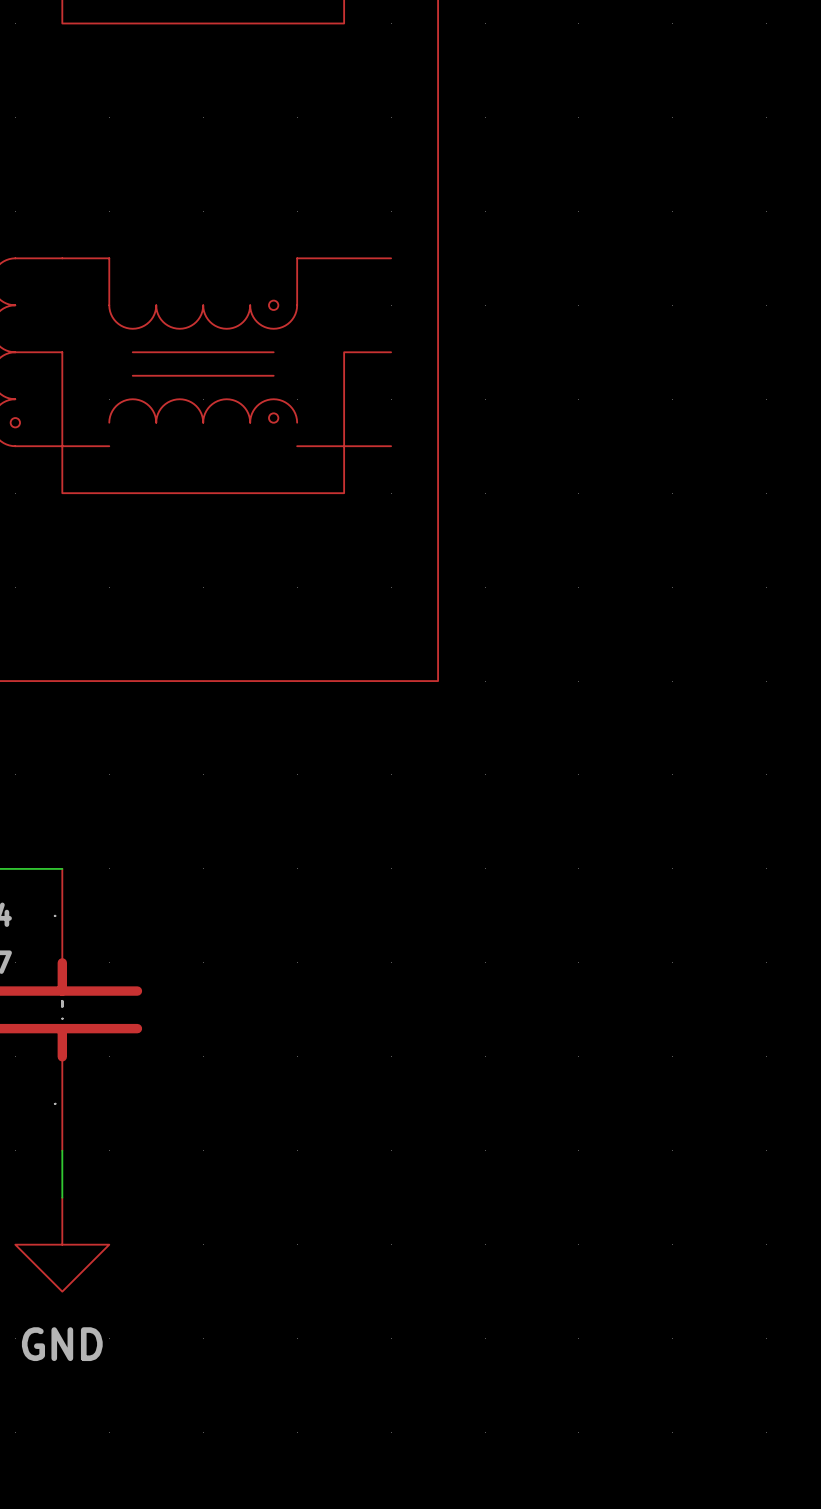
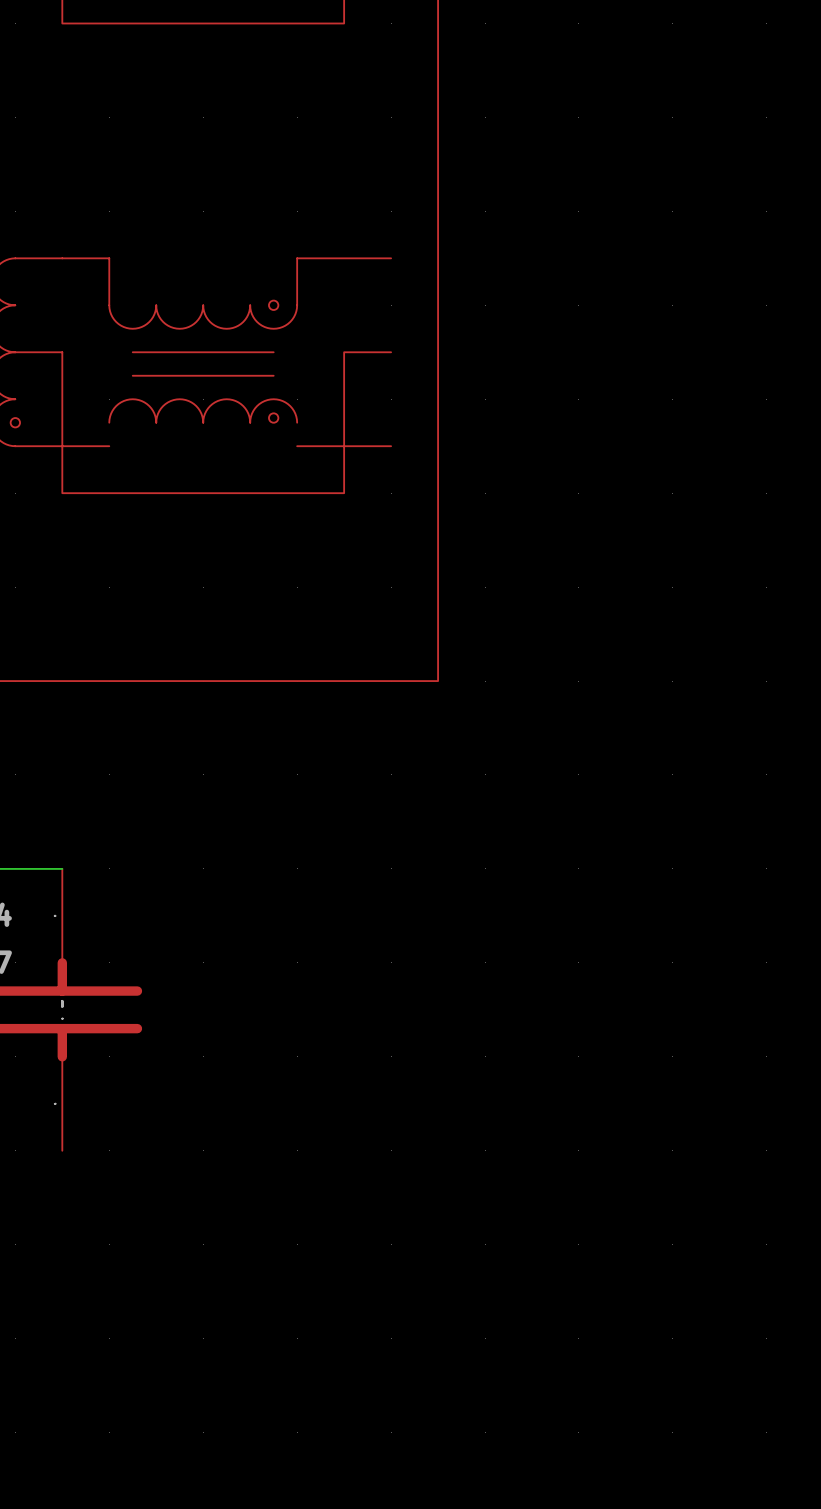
wire: (62, 1150) (62, 1197) -> none
power symbol: GND (62, 1244) -> none

